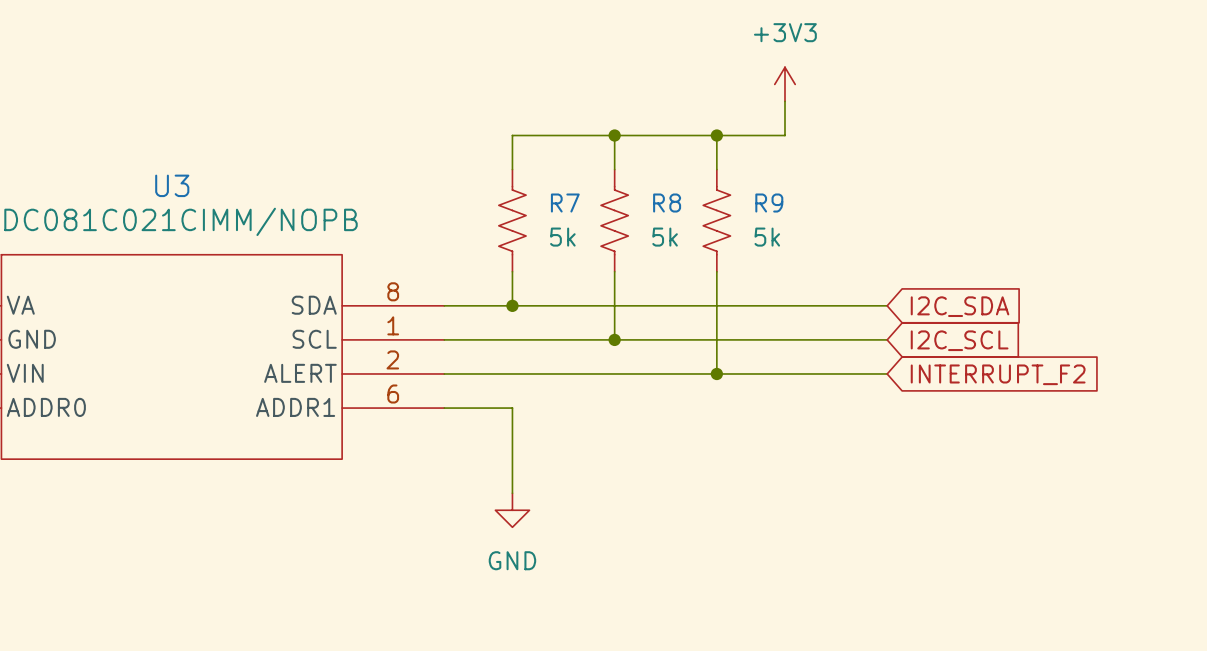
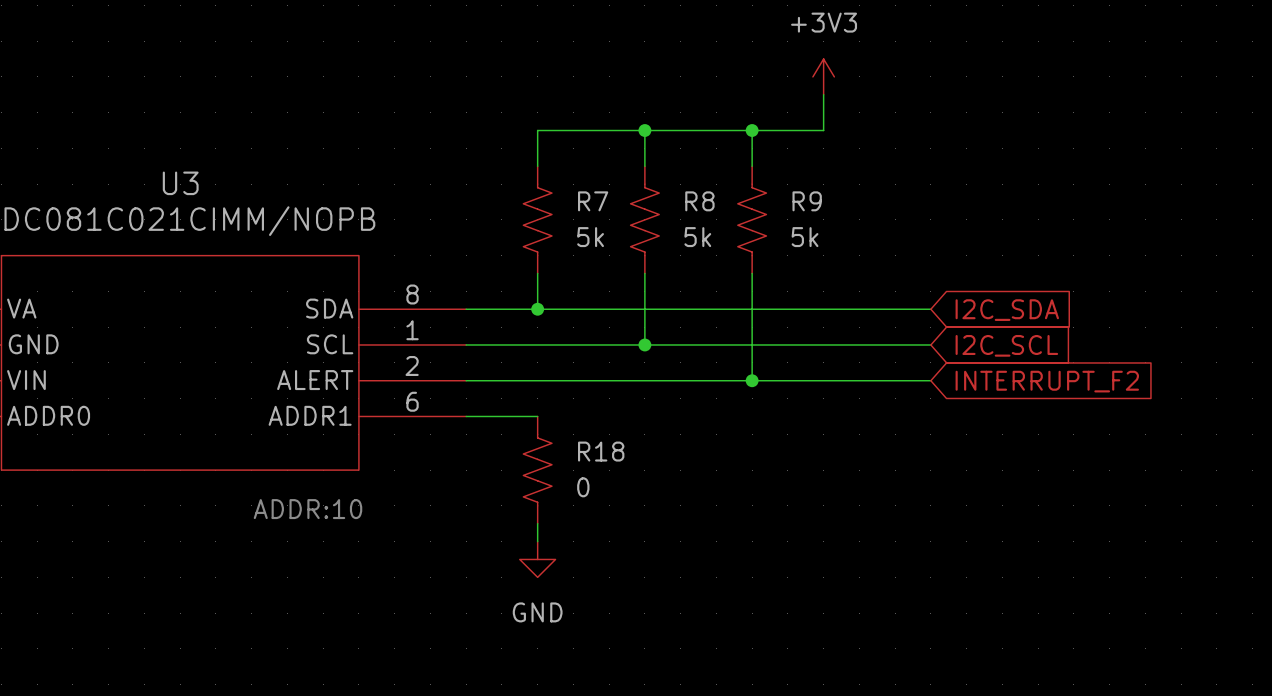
wire: (512, 408) (512, 493) -> none
R18: none -> 0 (537, 470)
text: none -> ADDR:10 (307, 509)
wire: none -> (537, 523) (537, 541)
power symbol position: GND (512, 510) -> GND (537, 559)

